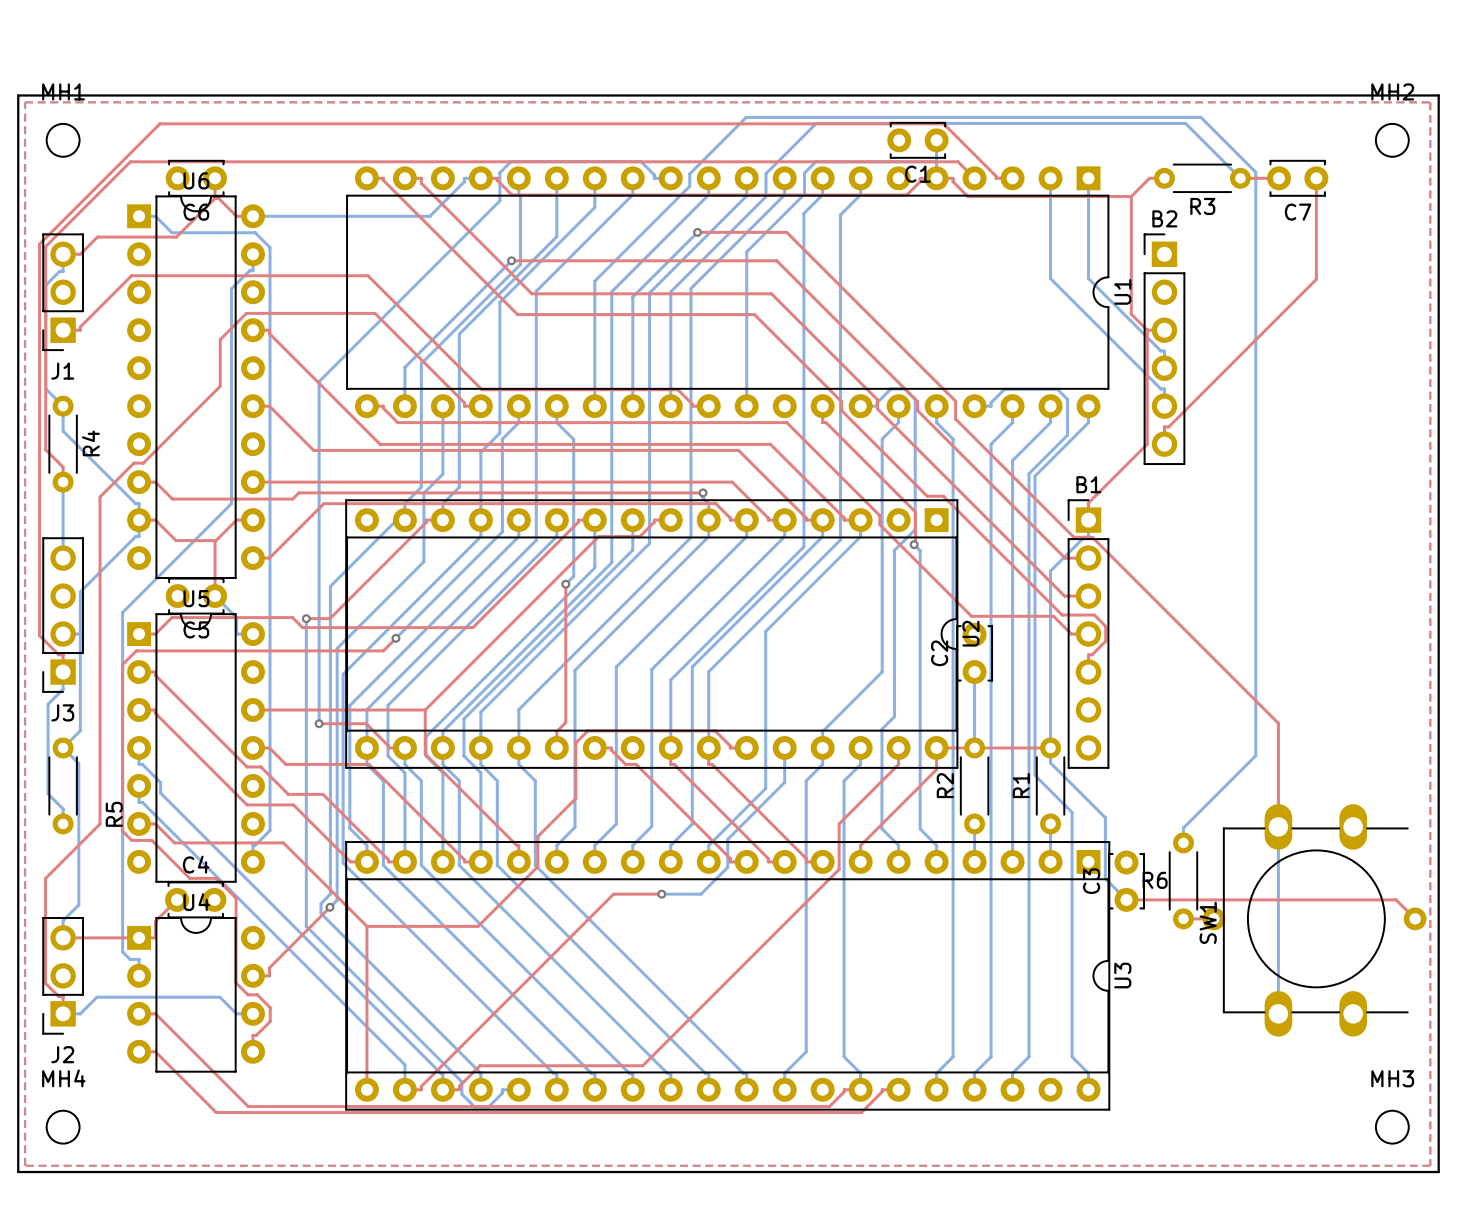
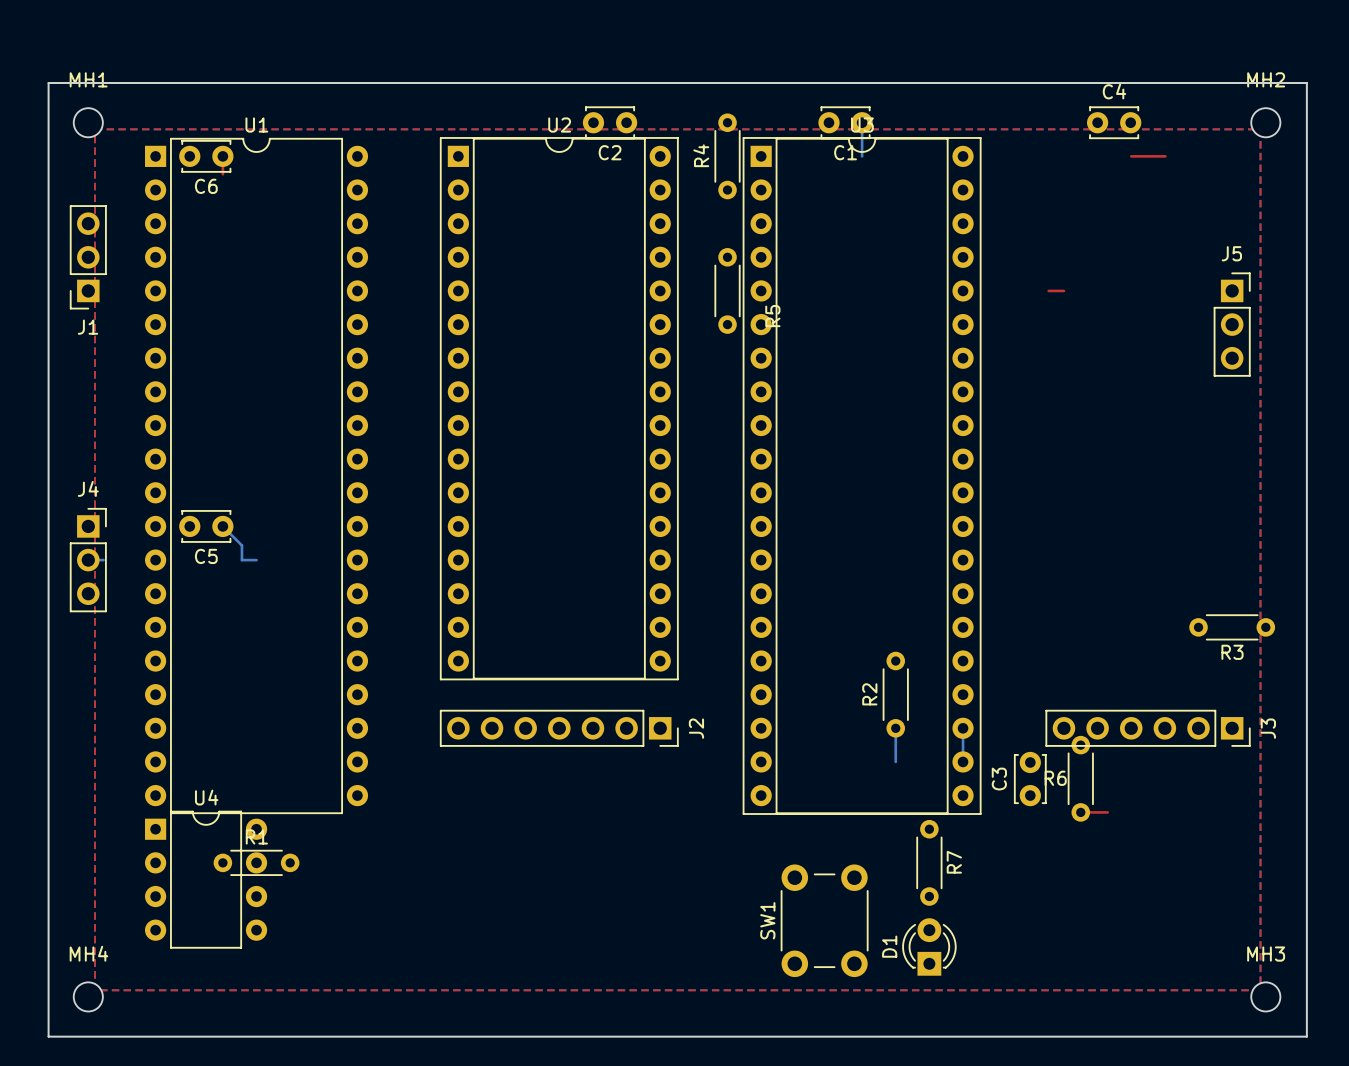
top zone outline: (25, 102) (25, 1165) (1430, 1165) (1430, 102) (25, 102) -> (94, 129) (94, 990) (1260, 990) (1260, 129) (94, 129)
bottom track: (936, 161) (815, 161) (804, 173) (804, 194) (746, 251) (746, 406) -> none
top track: (366, 178) (383, 178) (517, 314) (754, 314) (841, 401) (841, 410) (927, 496) (943, 496) (1062, 615) (1094, 615) (1105, 626) (1105, 641) (1092, 654) (1088, 654) (1088, 672) -> none
top track: (404, 178) (421, 178) (421, 183) (531, 293) (771, 293) (877, 399) (877, 409) (1064, 596) (1088, 596) -> none
top track: (480, 178) (497, 178) (512, 195) (906, 195) (920, 181) (920, 178) (953, 178) (953, 181) (967, 196) (1131, 196) -> none
bottom track: (480, 178) (464, 178) (464, 181) (429, 216) (253, 216) -> none
bottom track: (518, 178) (520, 264) (421, 363) (421, 487) (404, 503) (404, 520) -> none
bottom track: (556, 178) (556, 236) (459, 334) (459, 487) (442, 503) (442, 520) -> none
bottom track: (594, 178) (594, 207) (499, 302) (499, 433) (480, 452) (480, 536) (343, 674) (343, 863) (553, 1073) (556, 1073) (556, 1089) -> none
bottom track: (632, 178) (632, 194) (536, 291) (536, 540) (366, 709) (366, 764) (383, 780) (383, 865) (591, 1073) (594, 1073) (594, 1089) -> none
bottom track: (670, 178) (654, 178) (654, 174) (641, 161) (511, 161) (499, 172) (499, 200) (319, 381) (319, 723) -> none
bottom track: (708, 178) (708, 194) (611, 291) (611, 562) (442, 731) (442, 764) (459, 780) (459, 865) (667, 1073) (670, 1073) (670, 1089) -> none
bottom track: (746, 178) (746, 195) (649, 293) (649, 543) (480, 712) (480, 764) (497, 780) (497, 865) (705, 1073) (708, 1073) (708, 1089) -> none
bottom track: (784, 178) (784, 194) (690, 288) (690, 537) (518, 709) (518, 764) (535, 780) (535, 865) (743, 1073) (746, 1073) (746, 1089) -> none
bottom track: (822, 178) (822, 194) (803, 213) (803, 546) (670, 680) (670, 747) -> none
bottom track: (860, 178) (860, 194) (840, 214) (840, 539) (708, 671) (708, 747) -> none
top track: (974, 178) (958, 161) (130, 161) (45, 246) (45, 449) (63, 467) (63, 482) -> none
top track: (1012, 178) (996, 178) (943, 123) (159, 123) (39, 244) (39, 635) (58, 654) (63, 654) (63, 672) -> none
bottom track: (1050, 178) (1050, 278) (1160, 388) (1164, 388) (1164, 406) -> none
bottom track: (1088, 178) (1088, 278) (1160, 351) (1164, 351) (1164, 368) -> none
top track: (1164, 178) (1149, 178) (1131, 196) -> none
R3 position: (1202, 178) -> (1232, 627)
bottom track: (1240, 178) (1185, 123) (816, 123) (766, 173) (766, 196) (670, 291) (670, 406) -> none
C7: (1297, 178) -> none
top track: (1316, 178) (1316, 279) (1168, 426) (1164, 426) (1164, 444) -> none
top track: (1131, 196) (1131, 314) (1147, 330) (1147, 444) (1088, 502) (1088, 520) -> none
bottom track: (139, 216) (155, 216) (171, 232) (255, 232) (270, 247) (270, 830) (253, 845) (253, 861) -> none
top track: (253, 216) (236, 216) (218, 198) (215, 198) (176, 237) (97, 237) (80, 254) (63, 254) -> none
top track: (697, 232) (786, 232) (955, 401) (955, 419) (1073, 537) (1092, 537) (1278, 723) (1278, 826) -> none
bottom track: (697, 232) (632, 297) (632, 406) -> none
via: (697, 232) -> none
bottom track: (63, 254) (63, 271) (59, 271) (45, 285) (45, 388) (63, 406) (63, 431) (135, 503) (139, 503) (139, 536) (135, 536) (80, 591) (80, 730) (63, 747) (78, 763) (78, 904) (63, 920) (63, 937) -> none
bottom track: (253, 254) (253, 270) (249, 270) (231, 288) (231, 503) (122, 612) (122, 951) (130, 959) (139, 959) (139, 975) -> none
top track: (511, 260) (776, 260) (917, 401) (917, 410) (1065, 558) (1088, 558) -> none
bottom track: (511, 260) (404, 367) (404, 406) -> none
via: (511, 260) -> none
U1 rotation: 0° (727, 292) -> 90° counterclockwise (256, 475)
U1 position: (727, 292) -> (256, 475)
top track: (63, 330) (80, 330) (80, 327) (131, 275) (368, 275) (482, 389) (677, 389) (692, 406) (708, 406) -> none
top track: (253, 330) (269, 330) (269, 333) (380, 444) (770, 444) (844, 520) (860, 520) -> none
B2: (1164, 349) -> none
J5: none -> (1232, 324)
U6: (196, 387) -> none
top track: (253, 406) (269, 406) (313, 450) (738, 450) (806, 520) (822, 520) -> none
top track: (366, 406) (383, 406) (397, 422) (786, 422) (879, 515) (879, 524) (971, 616) (1053, 616) (1071, 634) (1088, 634) -> none
bottom track: (442, 406) (442, 474) (423, 493) (423, 561) (337, 648) (337, 900) (330, 907) -> none
top track: (480, 406) (464, 406) (464, 402) (375, 313) (246, 313) (220, 339) (220, 386) (143, 463) (133, 463) (100, 497) (100, 824) (45, 878) (45, 983) (58, 996) (63, 996) (63, 1013) -> none
bottom track: (518, 406) (518, 422) (502, 439) (502, 531) (395, 638) -> none
bottom track: (556, 406) (556, 422) (573, 439) (573, 576) (565, 584) -> none
bottom track: (594, 406) (594, 281) (689, 186) (689, 173) (746, 117) (1200, 117) (1255, 172) (1255, 755) (1183, 827) (1183, 842) -> none
top track: (822, 406) (822, 422) (826, 422) (915, 512) (914, 544) -> none
bottom track: (860, 406) (877, 406) (877, 402) (890, 388) (904, 388) (915, 399) (915, 529) (894, 550) (894, 716) (881, 729) (881, 828) (898, 845) (898, 861) -> none
bottom track: (898, 406) (898, 422) (882, 439) (882, 672) (822, 731) (822, 764) (806, 780) (806, 1051) (784, 1073) (784, 1089) -> none
bottom track: (936, 406) (936, 422) (953, 439) (953, 1056) (936, 1073) (936, 1089) -> none
bottom track: (974, 406) (991, 406) (991, 402) (1004, 389) (1057, 389) (1067, 399) (1067, 435) (1029, 473) (1029, 1056) (1012, 1073) (1012, 1089) -> none
bottom track: (1012, 406) (1012, 422) (991, 444) (991, 1056) (974, 1073) (974, 1089) -> none
bottom track: (1050, 406) (1050, 422) (1012, 460) (1012, 861) -> none
bottom track: (1088, 406) (1088, 422) (1035, 476) (1035, 775) (1072, 812) (1072, 1056) (1088, 1073) (1088, 1089) -> none
R4 name position: R4 (90, 443) -> R4 (701, 155)
R4 position: (63, 444) -> (727, 156)
bottom track: (63, 482) (63, 558) -> none
top track: (139, 482) (155, 482) (172, 499) (292, 499) (298, 492) (703, 492) -> none
top track: (253, 482) (732, 482) (768, 520) (784, 520) -> none
bottom track: (703, 492) (703, 497) (708, 503) (708, 536) (574, 670) (574, 827) (556, 845) (556, 861) -> none
via: (703, 492) -> none
bottom track: (404, 511) (330, 586) (330, 894) (321, 903) (321, 913) (480, 1073) (480, 1089) -> none
top track: (139, 520) (155, 520) (176, 540) (216, 540) (236, 520) (253, 520) -> none
top track: (442, 520) (426, 520) (329, 618) (306, 618) -> none
bottom track: (518, 520) (518, 536) (349, 705) (349, 828) (366, 845) (366, 861) -> none
bottom track: (556, 520) (556, 536) (387, 705) (387, 755) (404, 772) (404, 861) -> none
top track: (594, 520) (578, 520) (472, 627) (302, 627) (292, 617) (171, 617) (155, 634) (139, 634) -> none
bottom track: (594, 520) (594, 567) (425, 736) (425, 755) (442, 772) (442, 861) -> none
bottom track: (632, 520) (632, 550) (463, 718) (463, 755) (480, 772) (480, 861) -> none
top track: (670, 520) (654, 520) (639, 536) (598, 536) (425, 710) -> none
top track: (746, 520) (730, 520) (715, 503) (323, 503) (269, 558) (253, 558) -> none
bottom track: (746, 520) (746, 536) (616, 666) (616, 823) (594, 845) (594, 861) -> none
bottom track: (784, 520) (784, 536) (651, 669) (651, 826) (632, 845) (632, 861) -> none
bottom track: (822, 520) (822, 536) (692, 666) (692, 823) (670, 845) (670, 861) -> none
bottom track: (860, 520) (860, 536) (765, 631) (765, 788) (708, 845) (708, 861) -> none
bottom track: (1088, 520) (1088, 537) (1084, 537) (1050, 570) (1050, 762) (1105, 817) (1105, 878) (1126, 899) -> none
J3 footprint: [42, 537, 84, 693] -> [1045, 709, 1251, 747]
top track: (215, 540) (215, 596) -> none
bottom track: (914, 544) (920, 550) (920, 829) (936, 845) (936, 861) -> none
via: (914, 544) -> none
top track: (565, 584) (565, 722) (556, 731) (556, 747) -> none
via: (565, 584) -> none
bottom track: (306, 618) (306, 926) (461, 1081) (461, 1094) (474, 1107) (488, 1107) (502, 1093) (502, 1089) (518, 1089) -> none
via: (306, 618) -> none
J4: none -> (88, 560)
U2 rotation: 0° (651, 634) -> 90° counterclockwise (559, 408)
B1: (1088, 634) -> none
top track: (395, 638) (383, 650) (136, 650) (122, 664) (122, 831) (131, 840) (151, 840) (189, 878) (216, 878) (236, 898) (236, 982) (247, 994) (257, 994) (270, 1007) (270, 1021) (256, 1035) (253, 1035) (253, 1051) -> none
via: (395, 638) -> none
C2 name position: C2 (939, 653) -> C2 (610, 152)
C2 rotation: 0° (974, 653) -> 90° clockwise (610, 122)
C2 position: (974, 653) -> (610, 122)
bottom track: (63, 672) (63, 689) (48, 704) (48, 793) (63, 808) (63, 823) -> none
top track: (139, 672) (155, 672) (155, 675) (247, 766) (260, 766) (288, 794) (322, 794) (388, 861) (404, 861) -> none
bottom track: (974, 672) (974, 747) -> none
top track: (139, 710) (155, 710) (155, 713) (247, 804) (293, 804) (350, 861) (366, 861) -> none
top track: (253, 710) (425, 710) -> none
top track: (425, 710) (425, 753) (518, 845) (518, 861) -> none
J3 name position: J3 (62, 712) -> J3 (1268, 728)
top track: (319, 723) (366, 723) (388, 747) (404, 747) -> none
via: (319, 723) -> none
bottom track: (139, 747) (139, 764) (142, 764) (160, 782) (160, 793) (442, 1073) (442, 1089) -> none
U5: (196, 747) -> none
top track: (253, 747) (269, 747) (285, 764) (369, 764) (464, 861) (480, 861) -> none
bottom track: (404, 747) (404, 764) (421, 780) (421, 865) (629, 1073) (632, 1073) (632, 1089) -> none
top track: (594, 747) (611, 747) (625, 764) (636, 764) (730, 858) (730, 861) (746, 861) -> none
top track: (670, 747) (670, 764) (674, 764) (768, 858) (768, 861) (784, 861) -> none
top track: (708, 747) (708, 764) (712, 764) (806, 858) (806, 861) (822, 861) -> none
top track: (746, 747) (730, 747) (715, 730) (587, 730) (575, 742) (575, 798) (537, 836) (537, 866) (478, 926) (366, 926) -> none
bottom track: (784, 747) (784, 782) (727, 839) (727, 867) (700, 894) (661, 894) -> none
bottom track: (860, 747) (860, 764) (844, 781) (844, 1056) (860, 1073) (860, 1089) -> none
top track: (898, 747) (898, 764) (839, 823) (839, 869) (642, 1065) (479, 1065) (459, 1086) (459, 1089) (442, 1089) -> none
top track: (1050, 747) (936, 747) (936, 769) (860, 845) (860, 861) -> none
R5 position: (63, 785) -> (727, 290)
bottom track: (139, 785) (139, 802) (142, 802) (404, 1064) (404, 1089) -> none
R1 rotation: 0° (1050, 785) -> 90° clockwise (256, 862)
R1 position: (1050, 785) -> (256, 862)
SW1 footprint: [1202, 804, 1427, 1037] -> [780, 864, 869, 978]
top track: (139, 823) (155, 823) (174, 842) (283, 842) (366, 926) -> none
bottom track: (1278, 826) (1278, 1013) -> none
top track: (661, 894) (613, 894) (421, 1086) (421, 1089) (404, 1089) -> none
via: (661, 894) -> none
top track: (177, 899) (155, 921) (155, 937) (63, 937) -> none
C4 position: (195, 899) -> (1114, 122)
top track: (1126, 899) (1396, 899) (1415, 918) -> none
top track: (330, 907) (269, 967) (269, 975) (253, 975) -> none
via: (330, 907) -> none
J2 footprint: [42, 917, 84, 1035] -> [439, 709, 679, 747]
SW1 name position: SW1 (1208, 922) -> SW1 (767, 920)
top track: (366, 926) (366, 1089) -> none
U3 rotation: 0° (727, 975) -> 90° counterclockwise (862, 475)
U3 position: (727, 975) -> (862, 475)
R7: none -> (929, 862)
bottom track: (63, 1013) (80, 1013) (96, 997) (219, 997) (236, 1013) (253, 1013) -> none
top track: (139, 1013) (155, 1013) (248, 1106) (829, 1106) (844, 1089) (860, 1089) -> none
top track: (139, 1051) (155, 1051) (216, 1112) (861, 1112) (882, 1089) (898, 1089) -> none
J2 name position: J2 (62, 1054) -> J2 (696, 728)
D1: none -> (929, 946)

